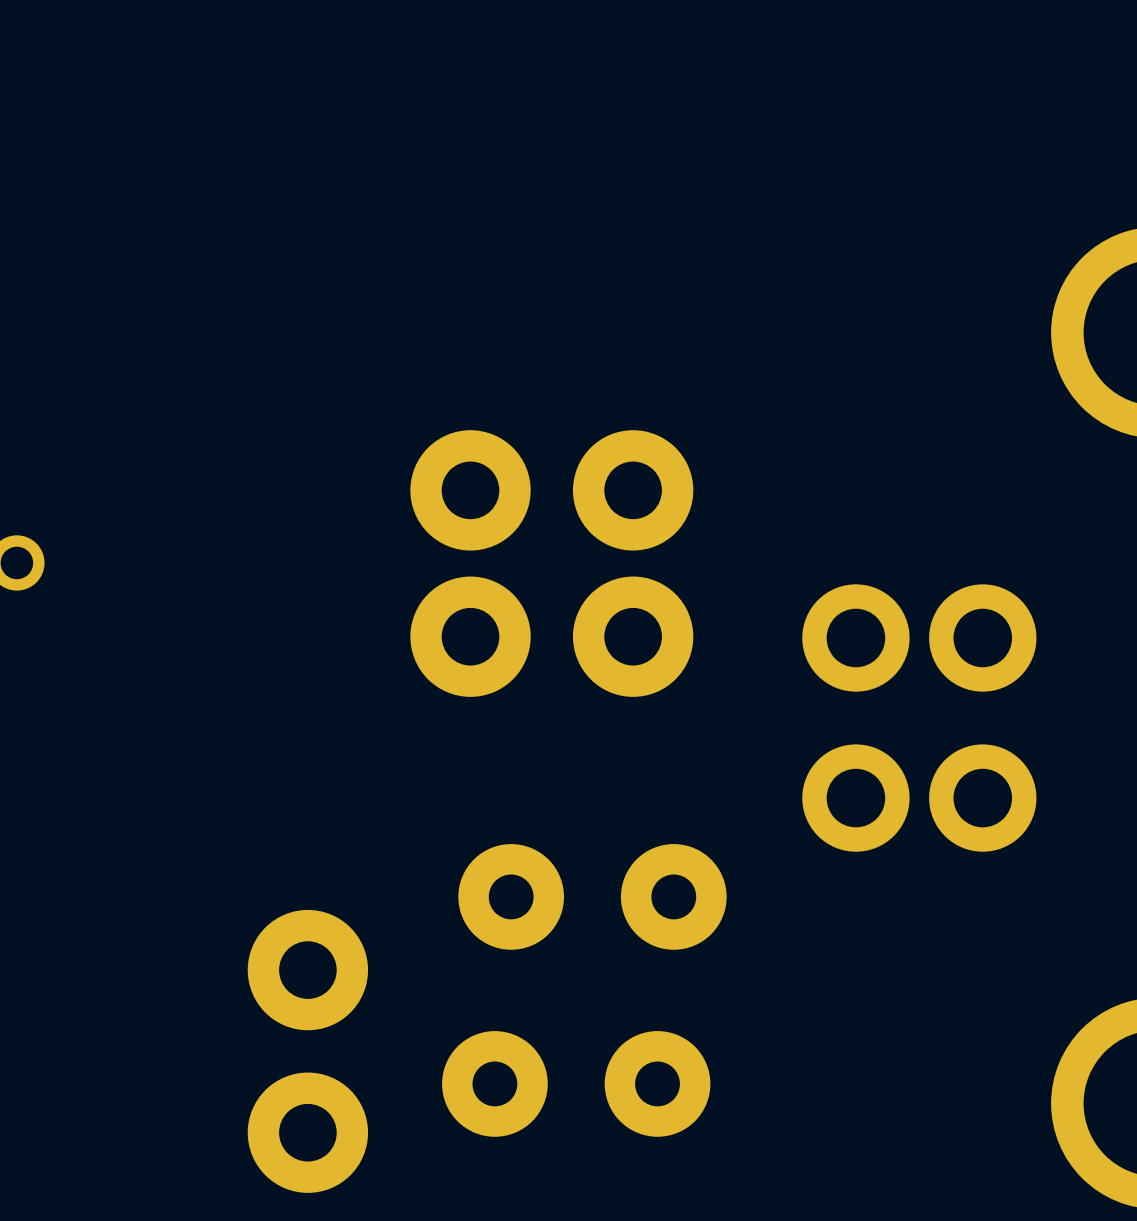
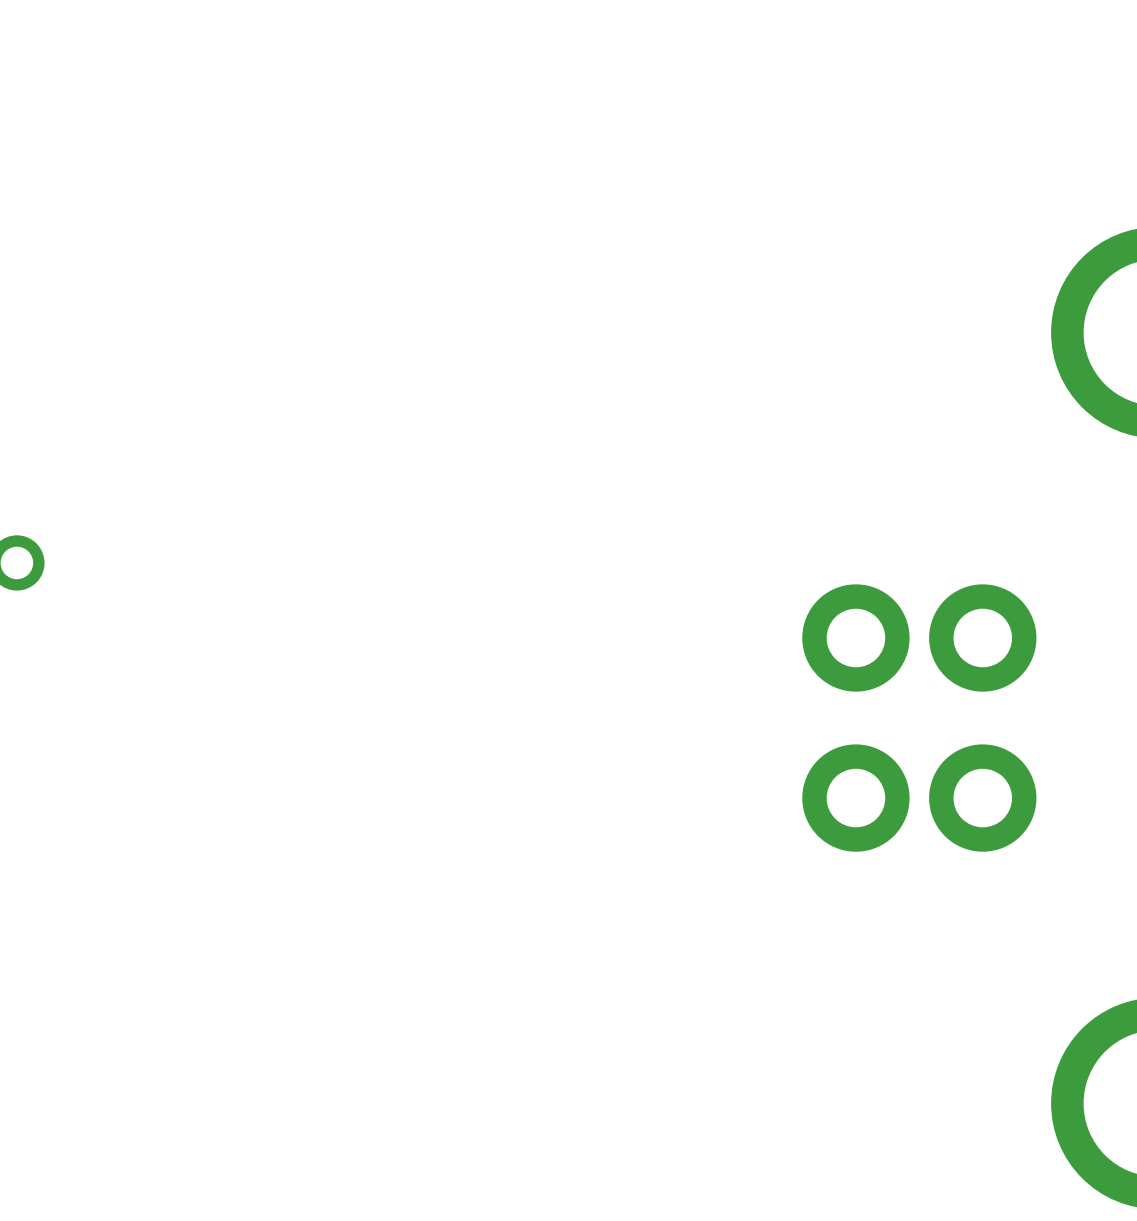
part: (551, 490) -> none
part: (551, 636) -> none
part: (592, 896) -> none
part: (307, 1051) -> none
part: (576, 1083) -> none

